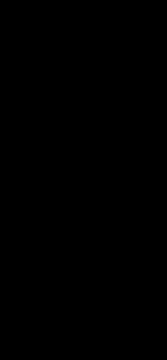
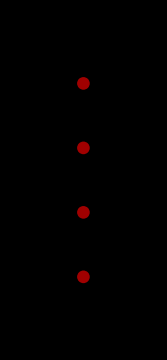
part: none -> (83, 83)
part: none -> (83, 147)
part: none -> (83, 212)
part: none -> (83, 276)

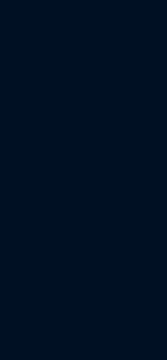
part: (83, 83) -> none
part: (83, 147) -> none
part: (83, 212) -> none
part: (83, 276) -> none

